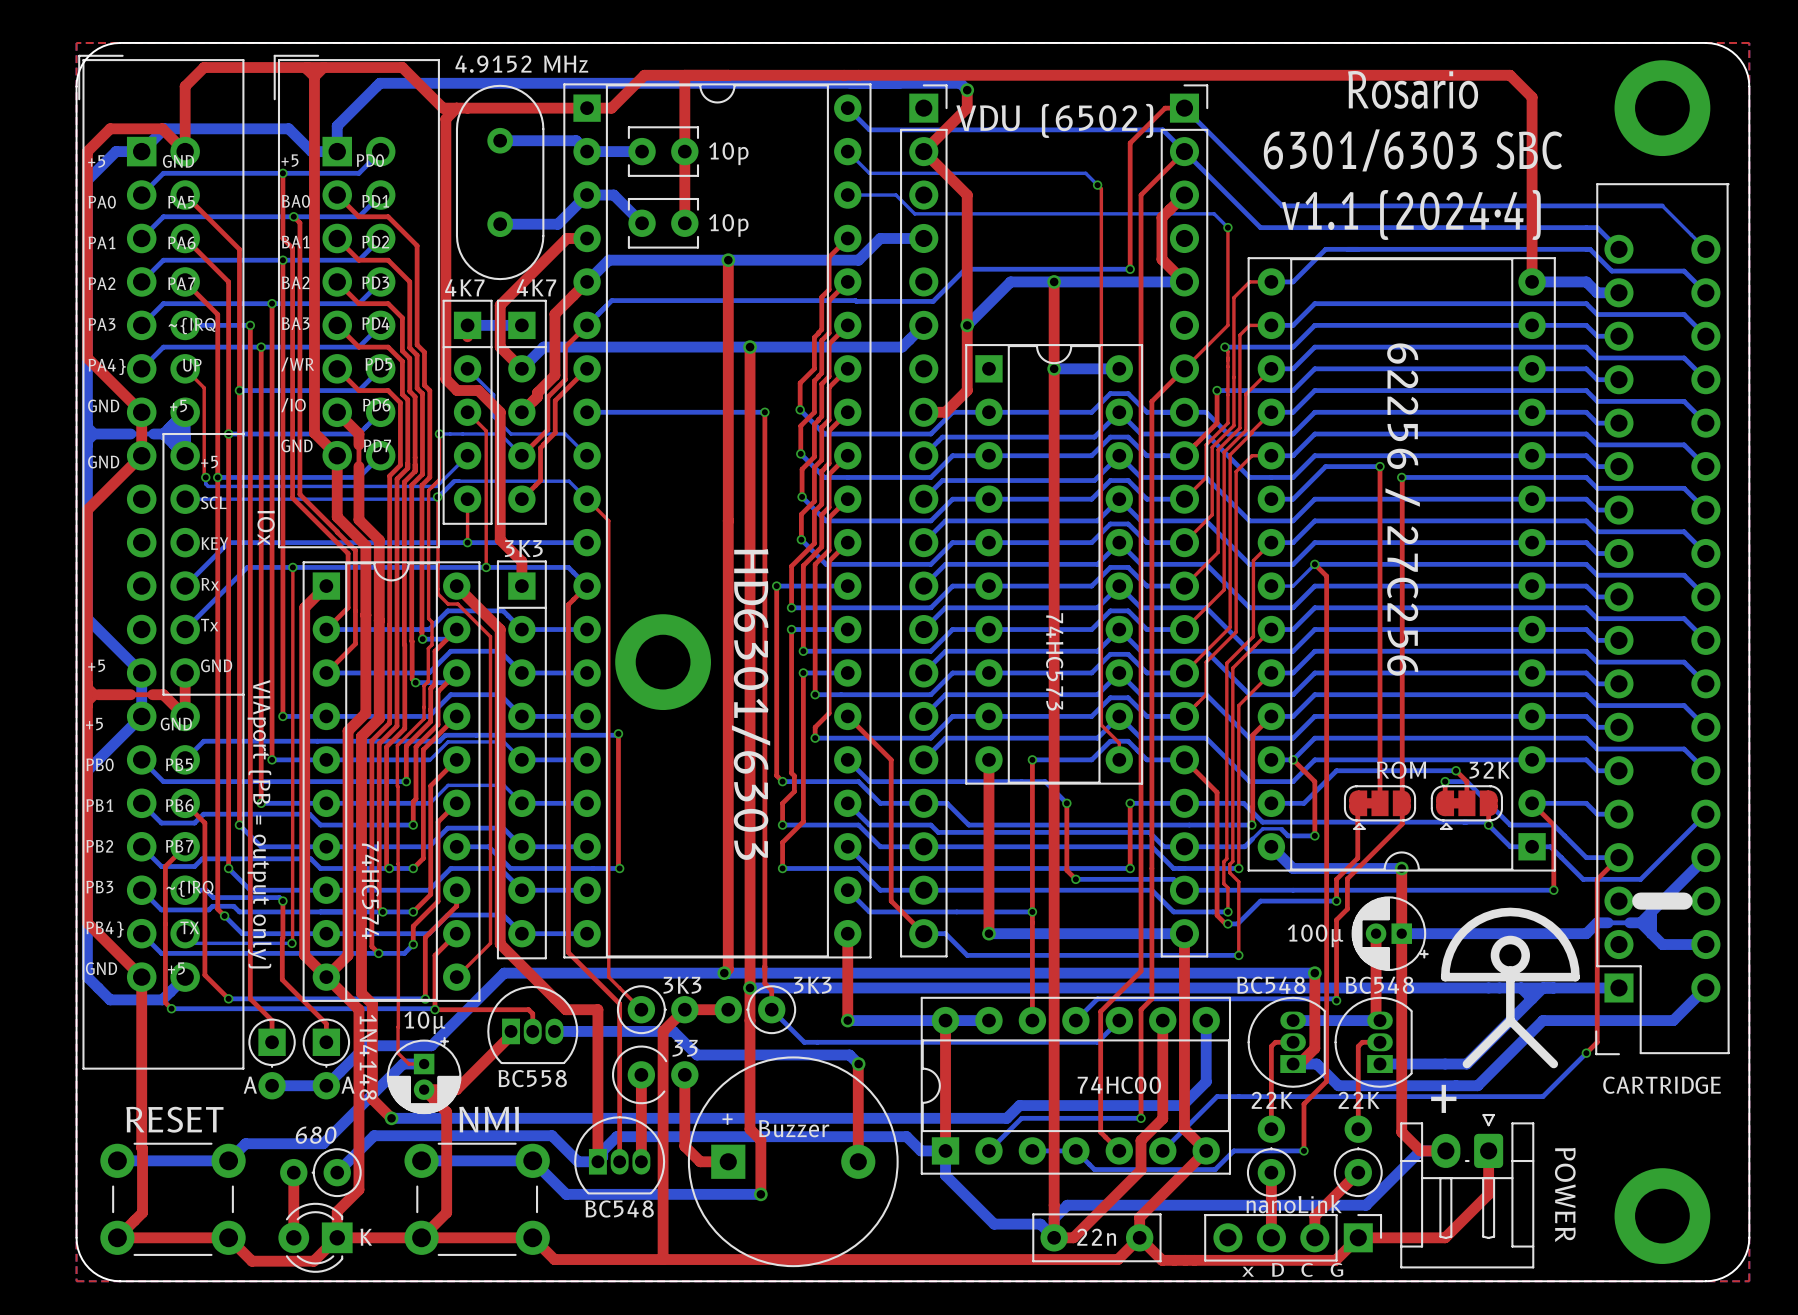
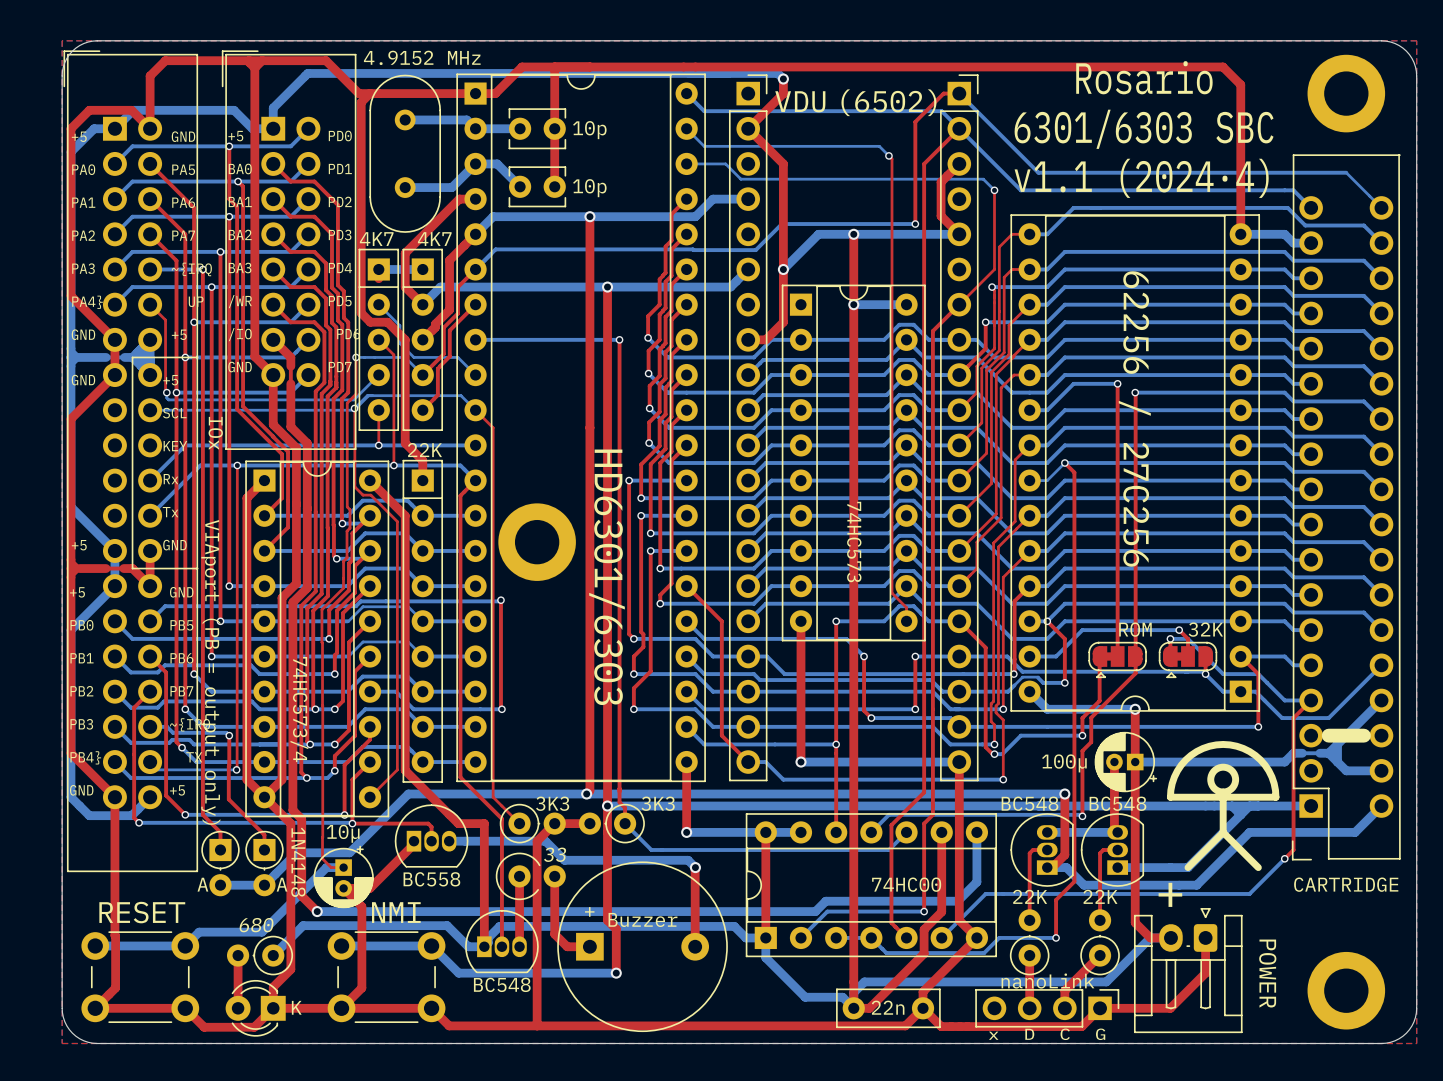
part value: 3K3 (523, 548) -> 22K (424, 450)
part value: 74HC574 (370, 890) -> 74HC573/4 (299, 709)

